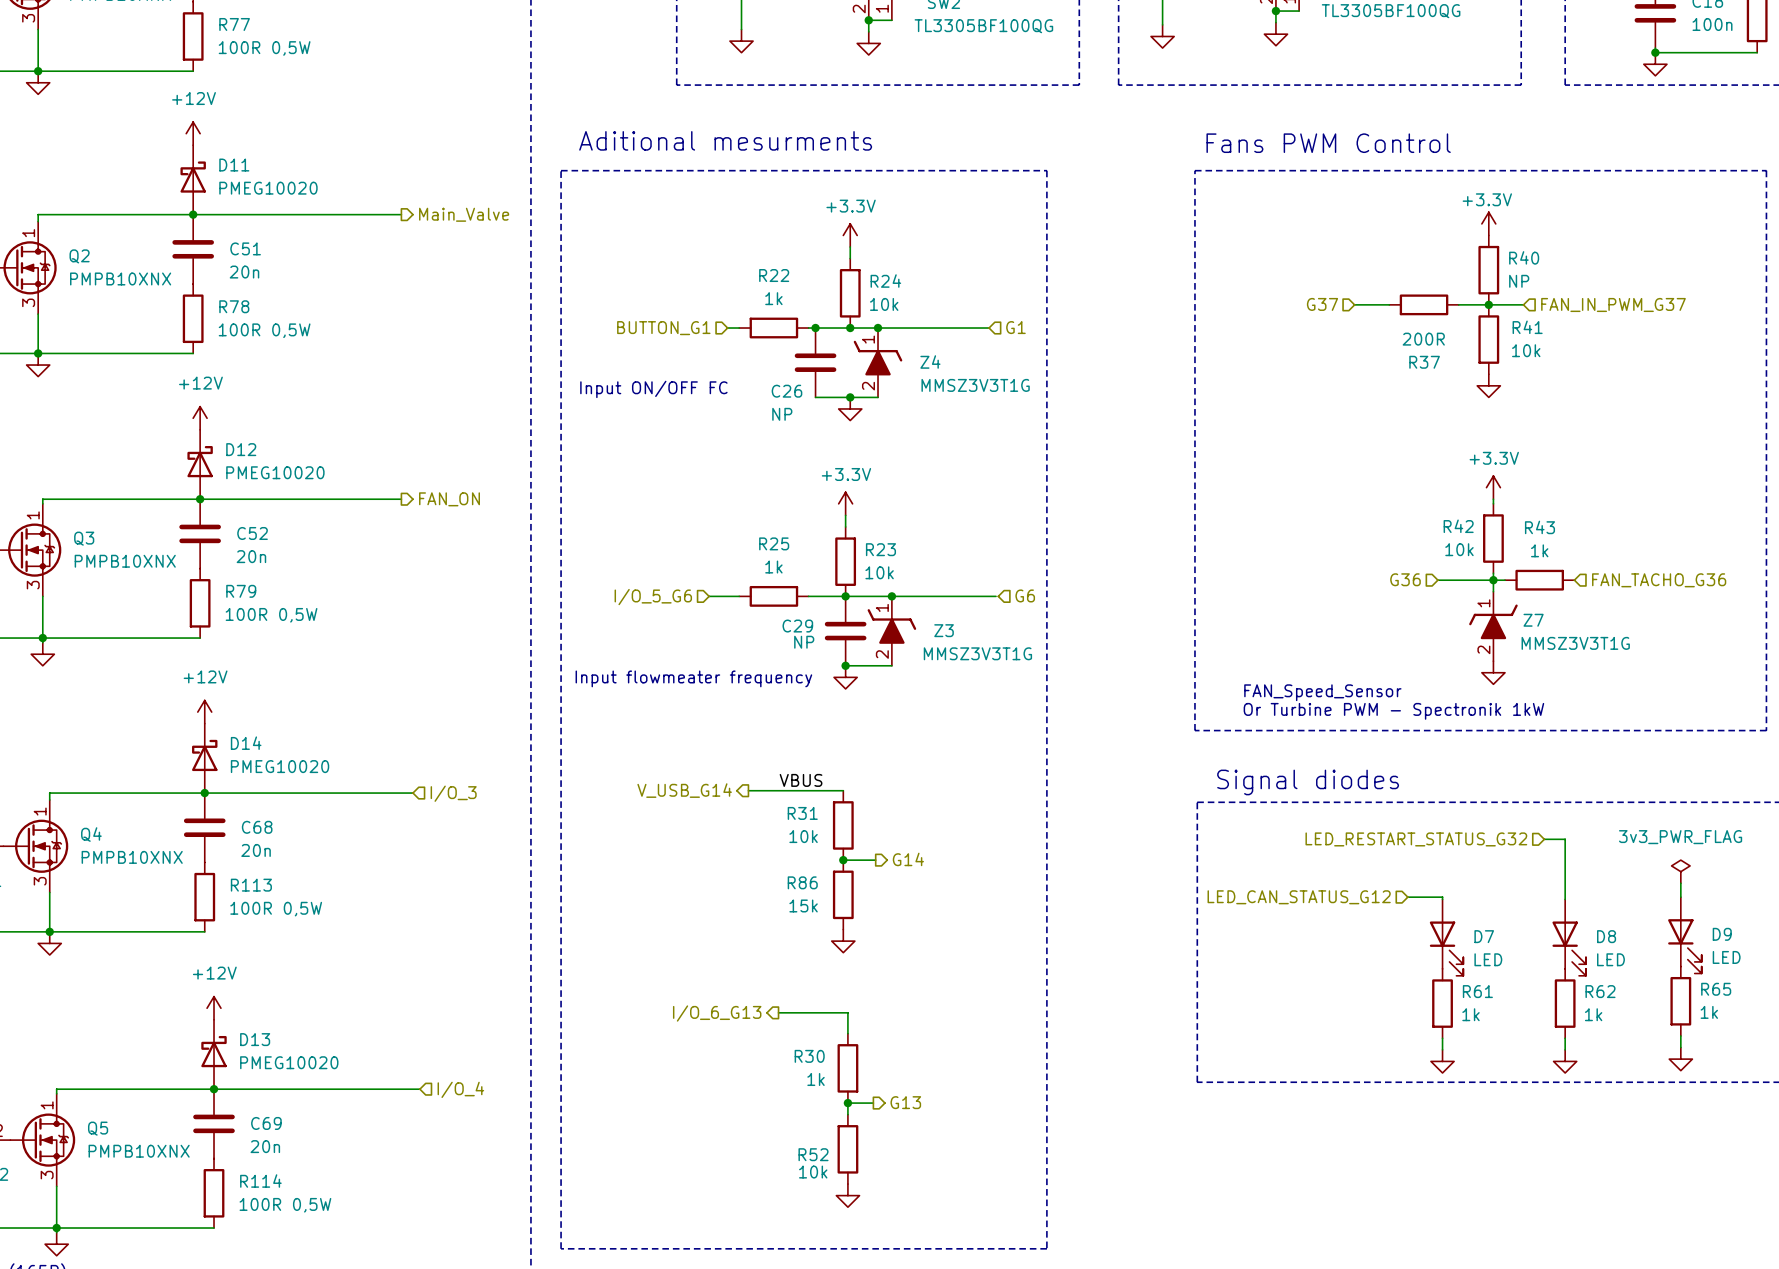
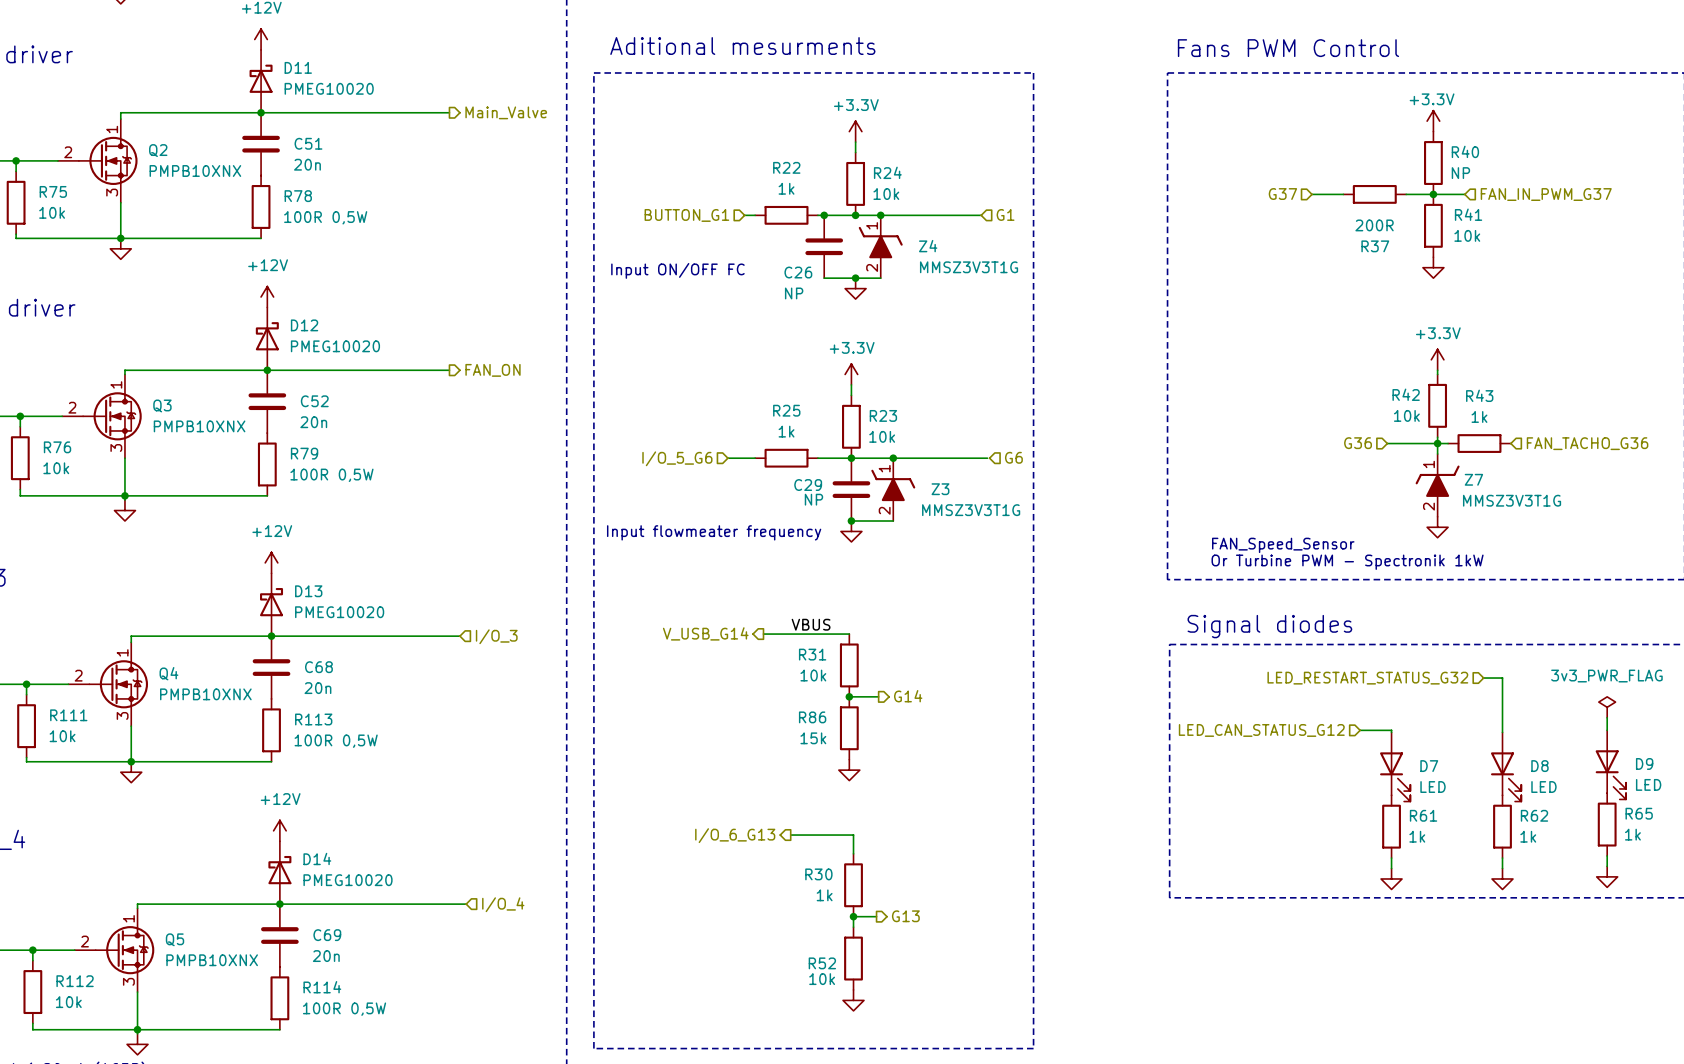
D14 name: D14 (246, 743) -> D13 (308, 591)
D13 name: D13 (255, 1039) -> D14 (317, 858)

